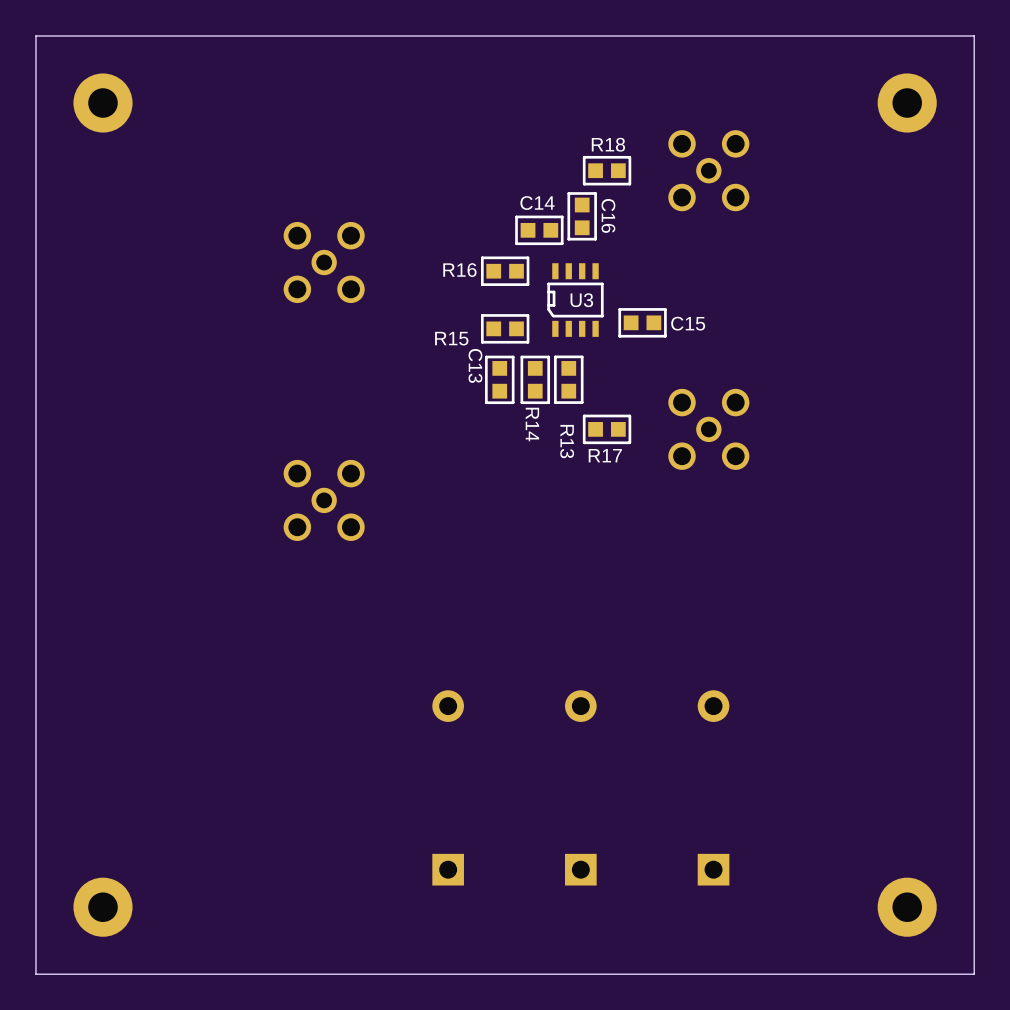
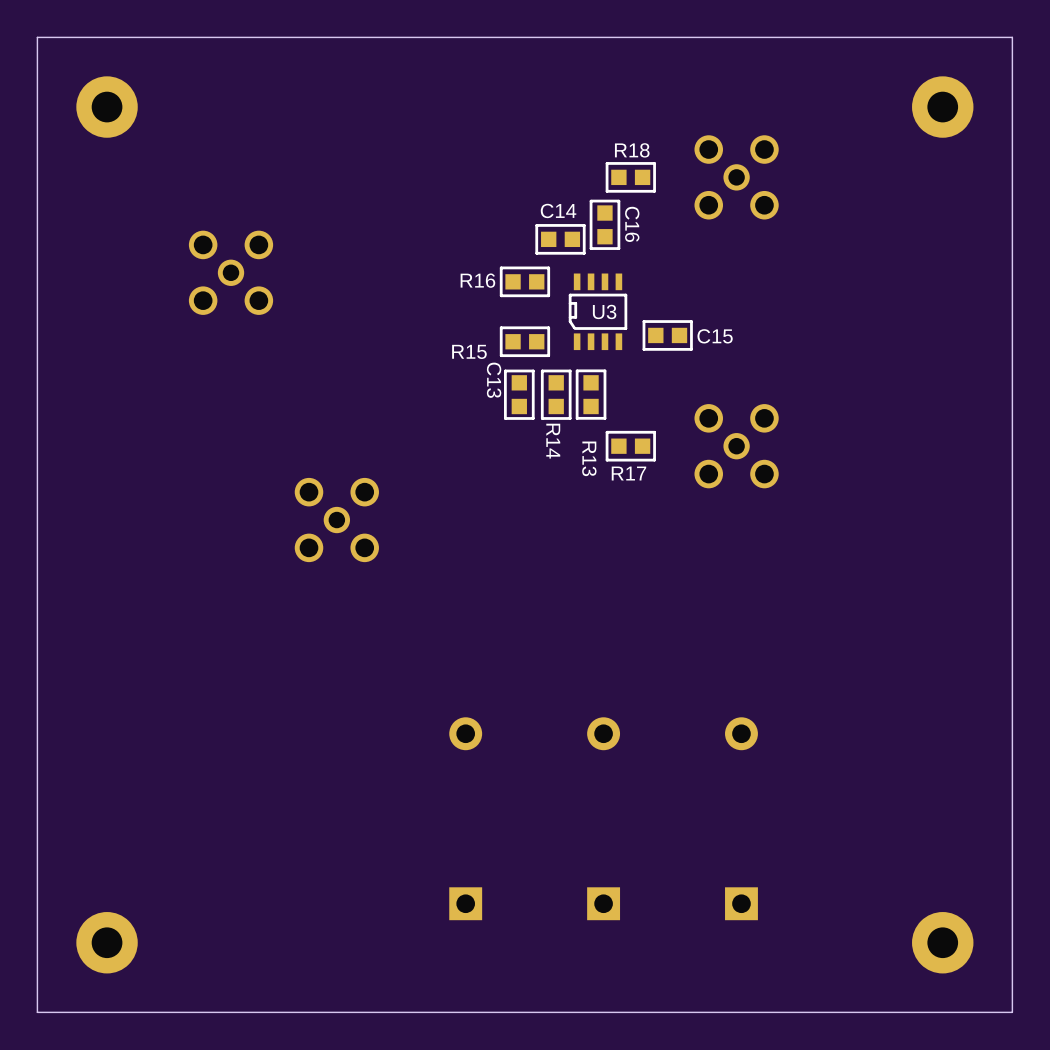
part position: (324, 262) -> (231, 272)

